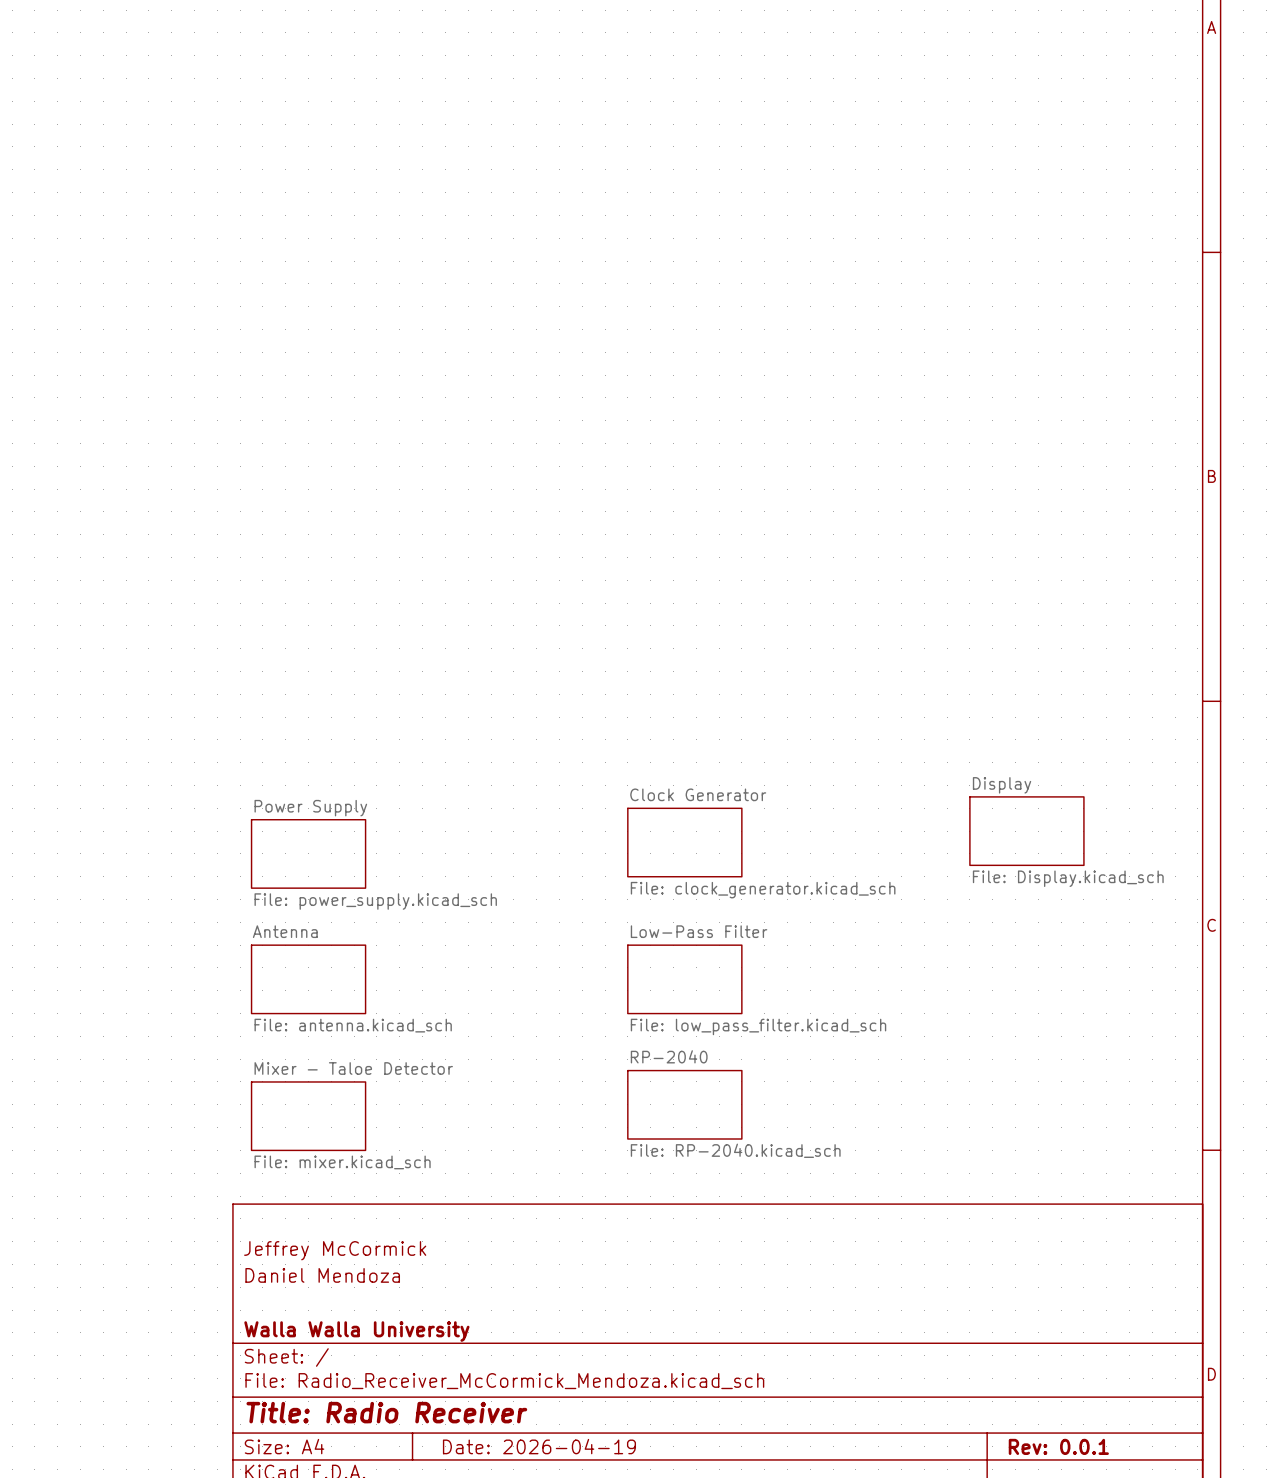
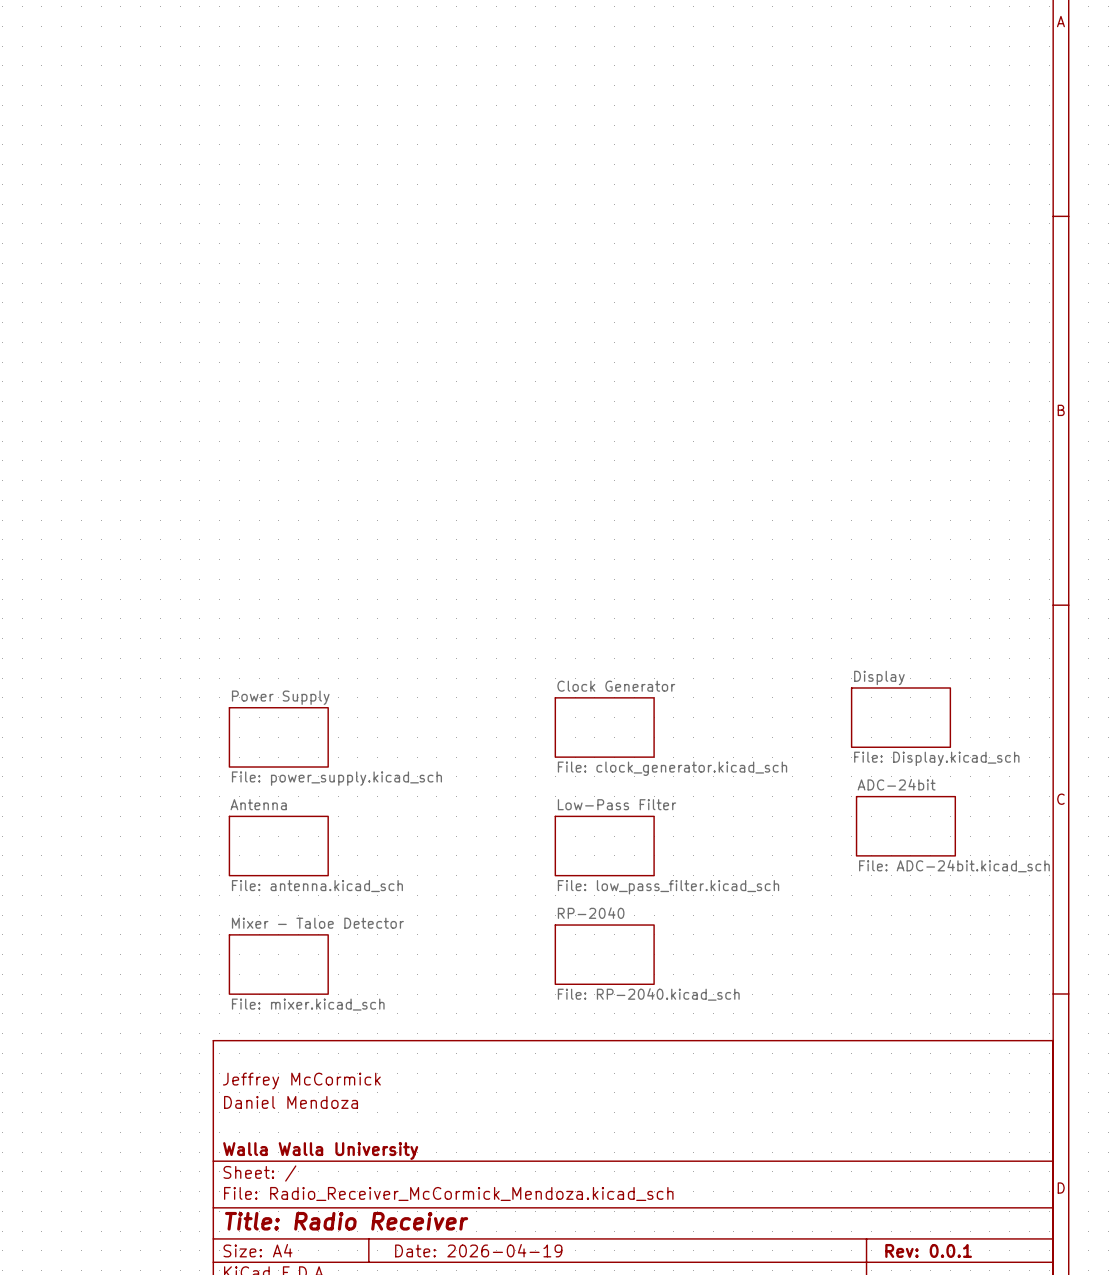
sheet ADC-24bit: none -> File: ADC-24bit.kicad_sch (905, 826)

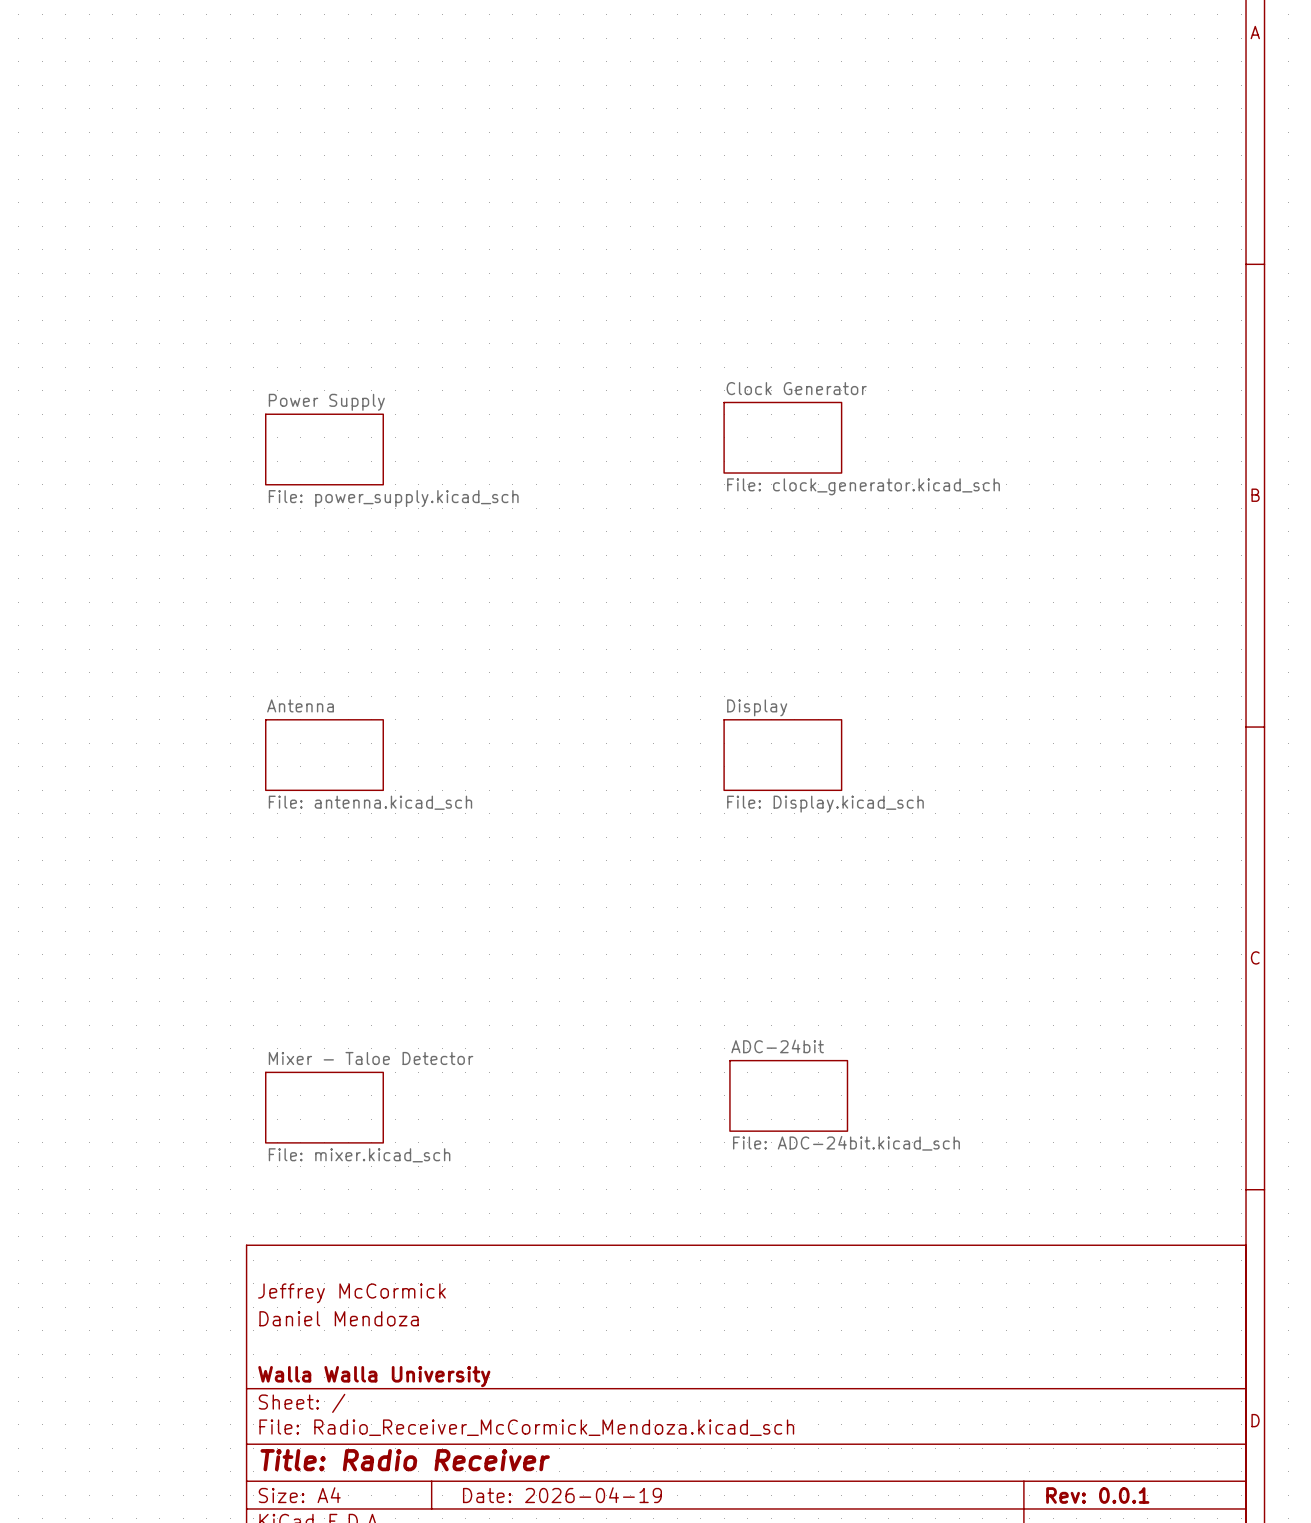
sheet Clock Generator: none -> File: clock_generator.kicad_sch (782, 437)
sheet Power Supply: none -> File: power_supply.kicad_sch (324, 449)
sheet Antenna: none -> File: antenna.kicad_sch (324, 755)
sheet Display: none -> File: Display.kicad_sch (782, 755)
sheet Display: File: Display.kicad_sch (900, 717) -> none
sheet Clock Generator: File: clock_generator.kicad_sch (604, 727) -> none
sheet Power Supply: File: power_supply.kicad_sch (278, 737) -> none
sheet ADC-24bit position: (905, 826) -> (788, 1095)
sheet Antenna: File: antenna.kicad_sch (278, 846) -> none
sheet Low-Pass Filter: File: low_pass_filter.kicad_sch (604, 846) -> none
sheet RP-2040: File: RP-2040.kicad_sch (604, 954) -> none
sheet Mixer - Taloe Detector position: (278, 964) -> (324, 1107)

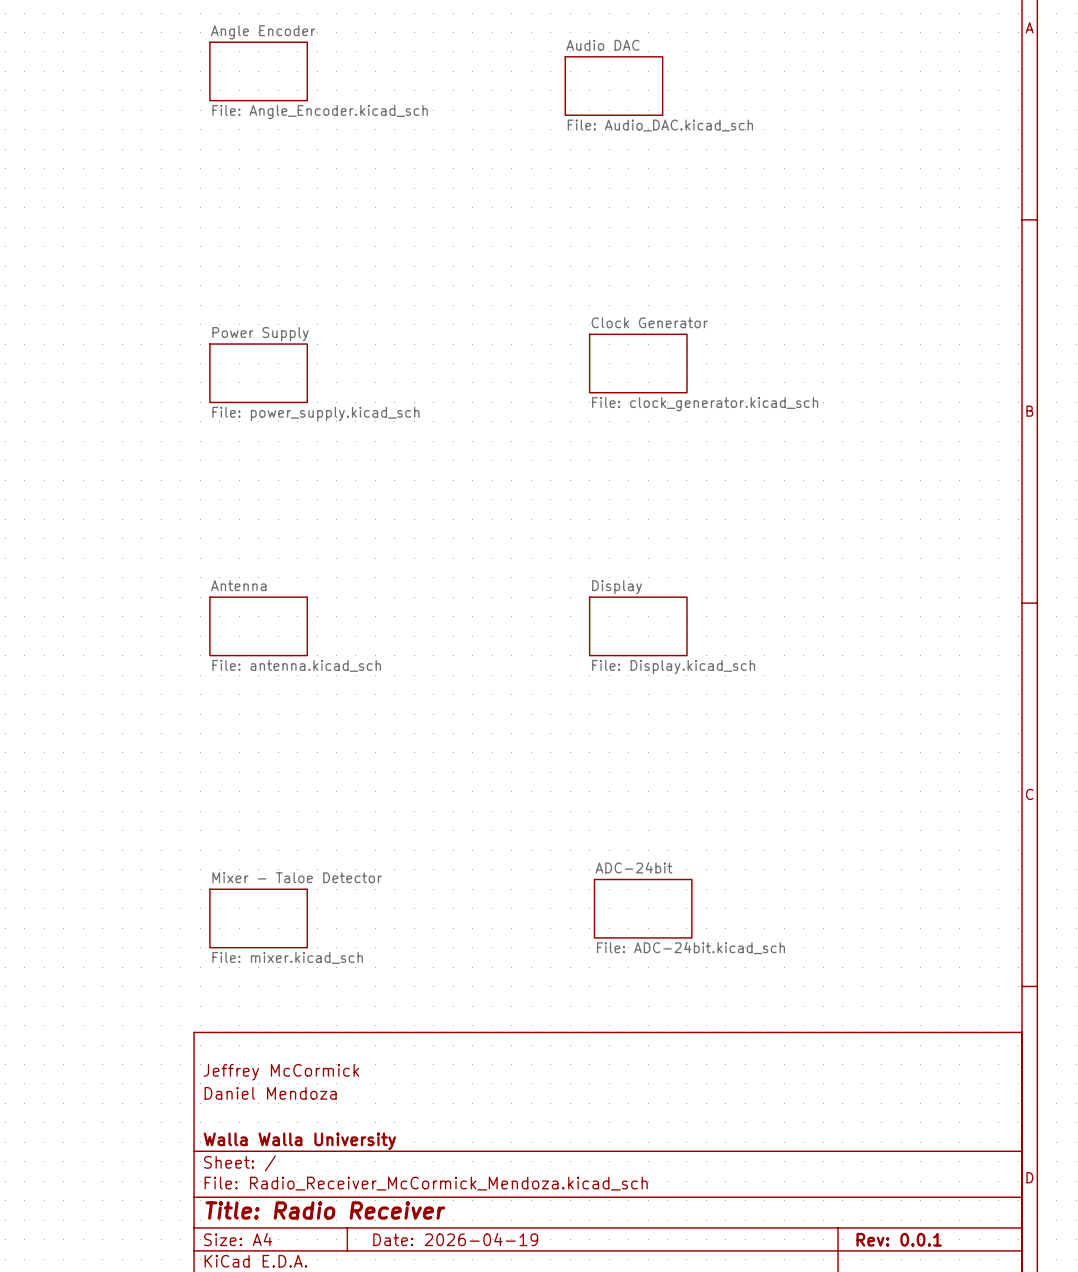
sheet Angle Encoder: none -> File: Angle_Encoder.kicad_sch (258, 71)
sheet Audio DAC: none -> File: Audio_DAC.kicad_sch (613, 86)

